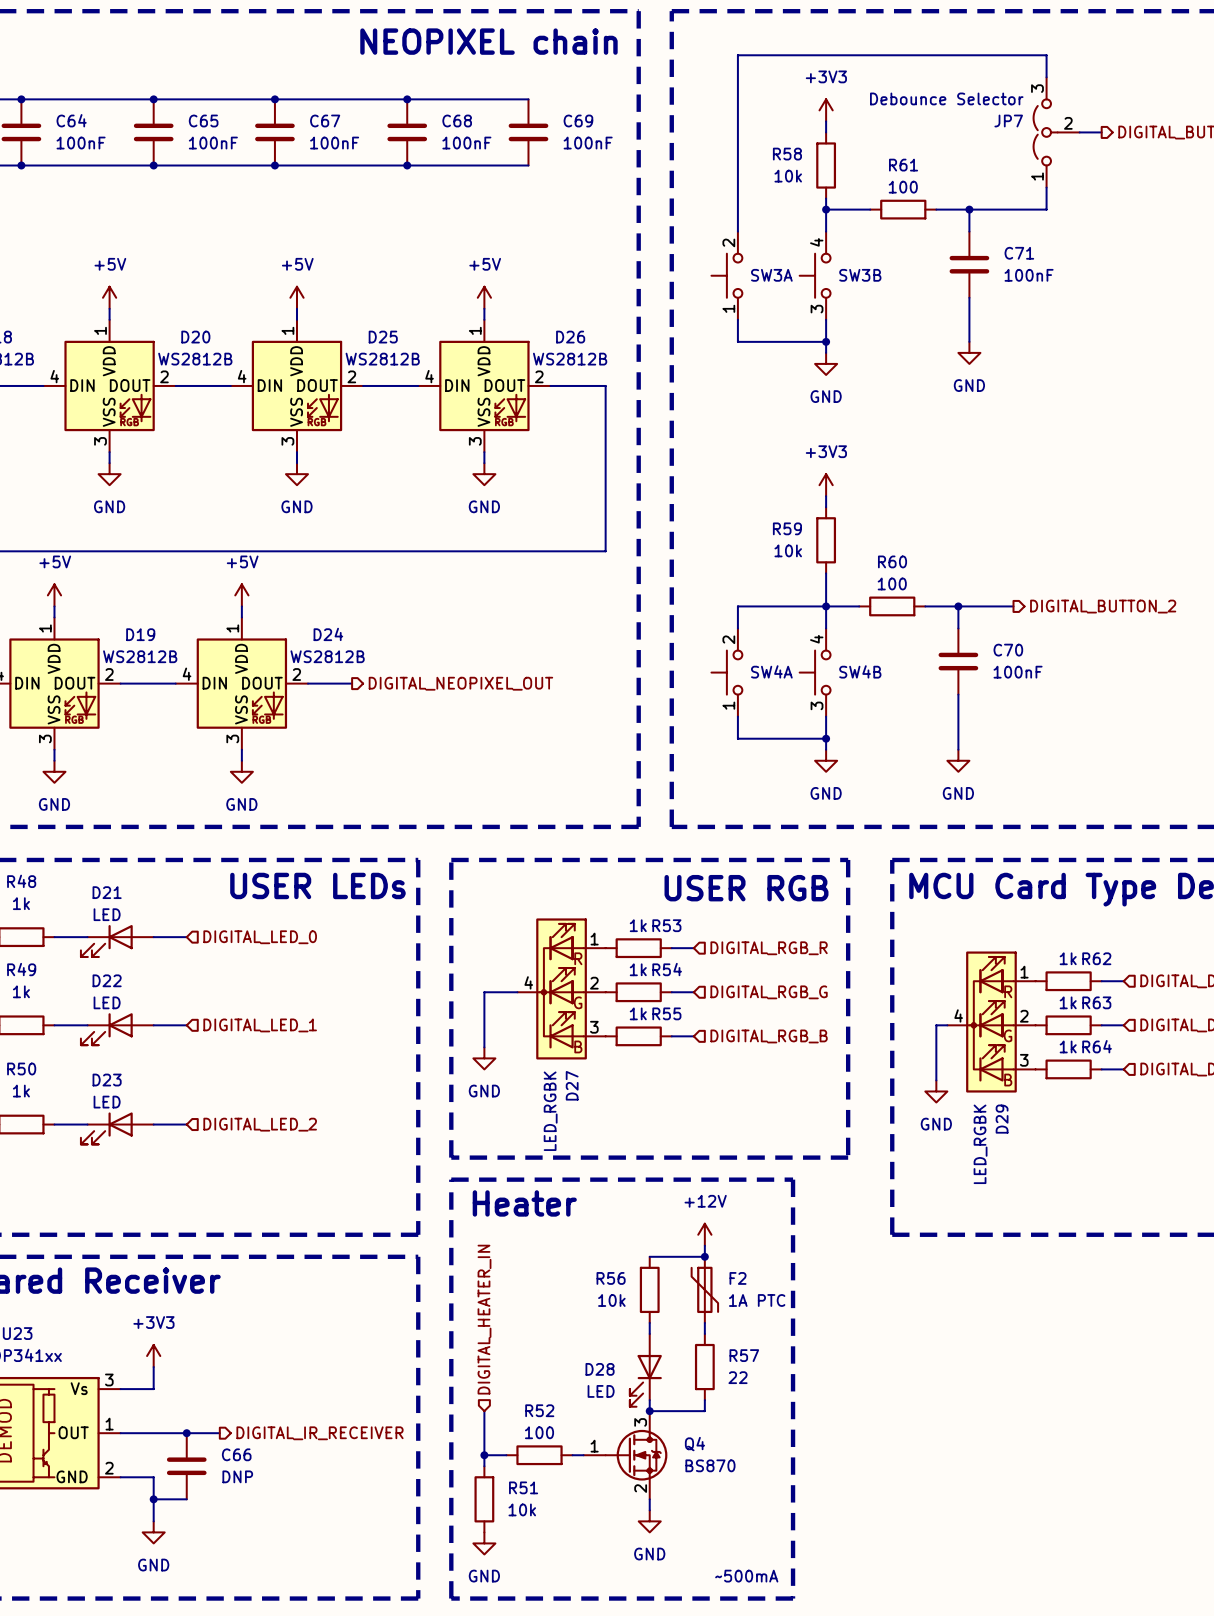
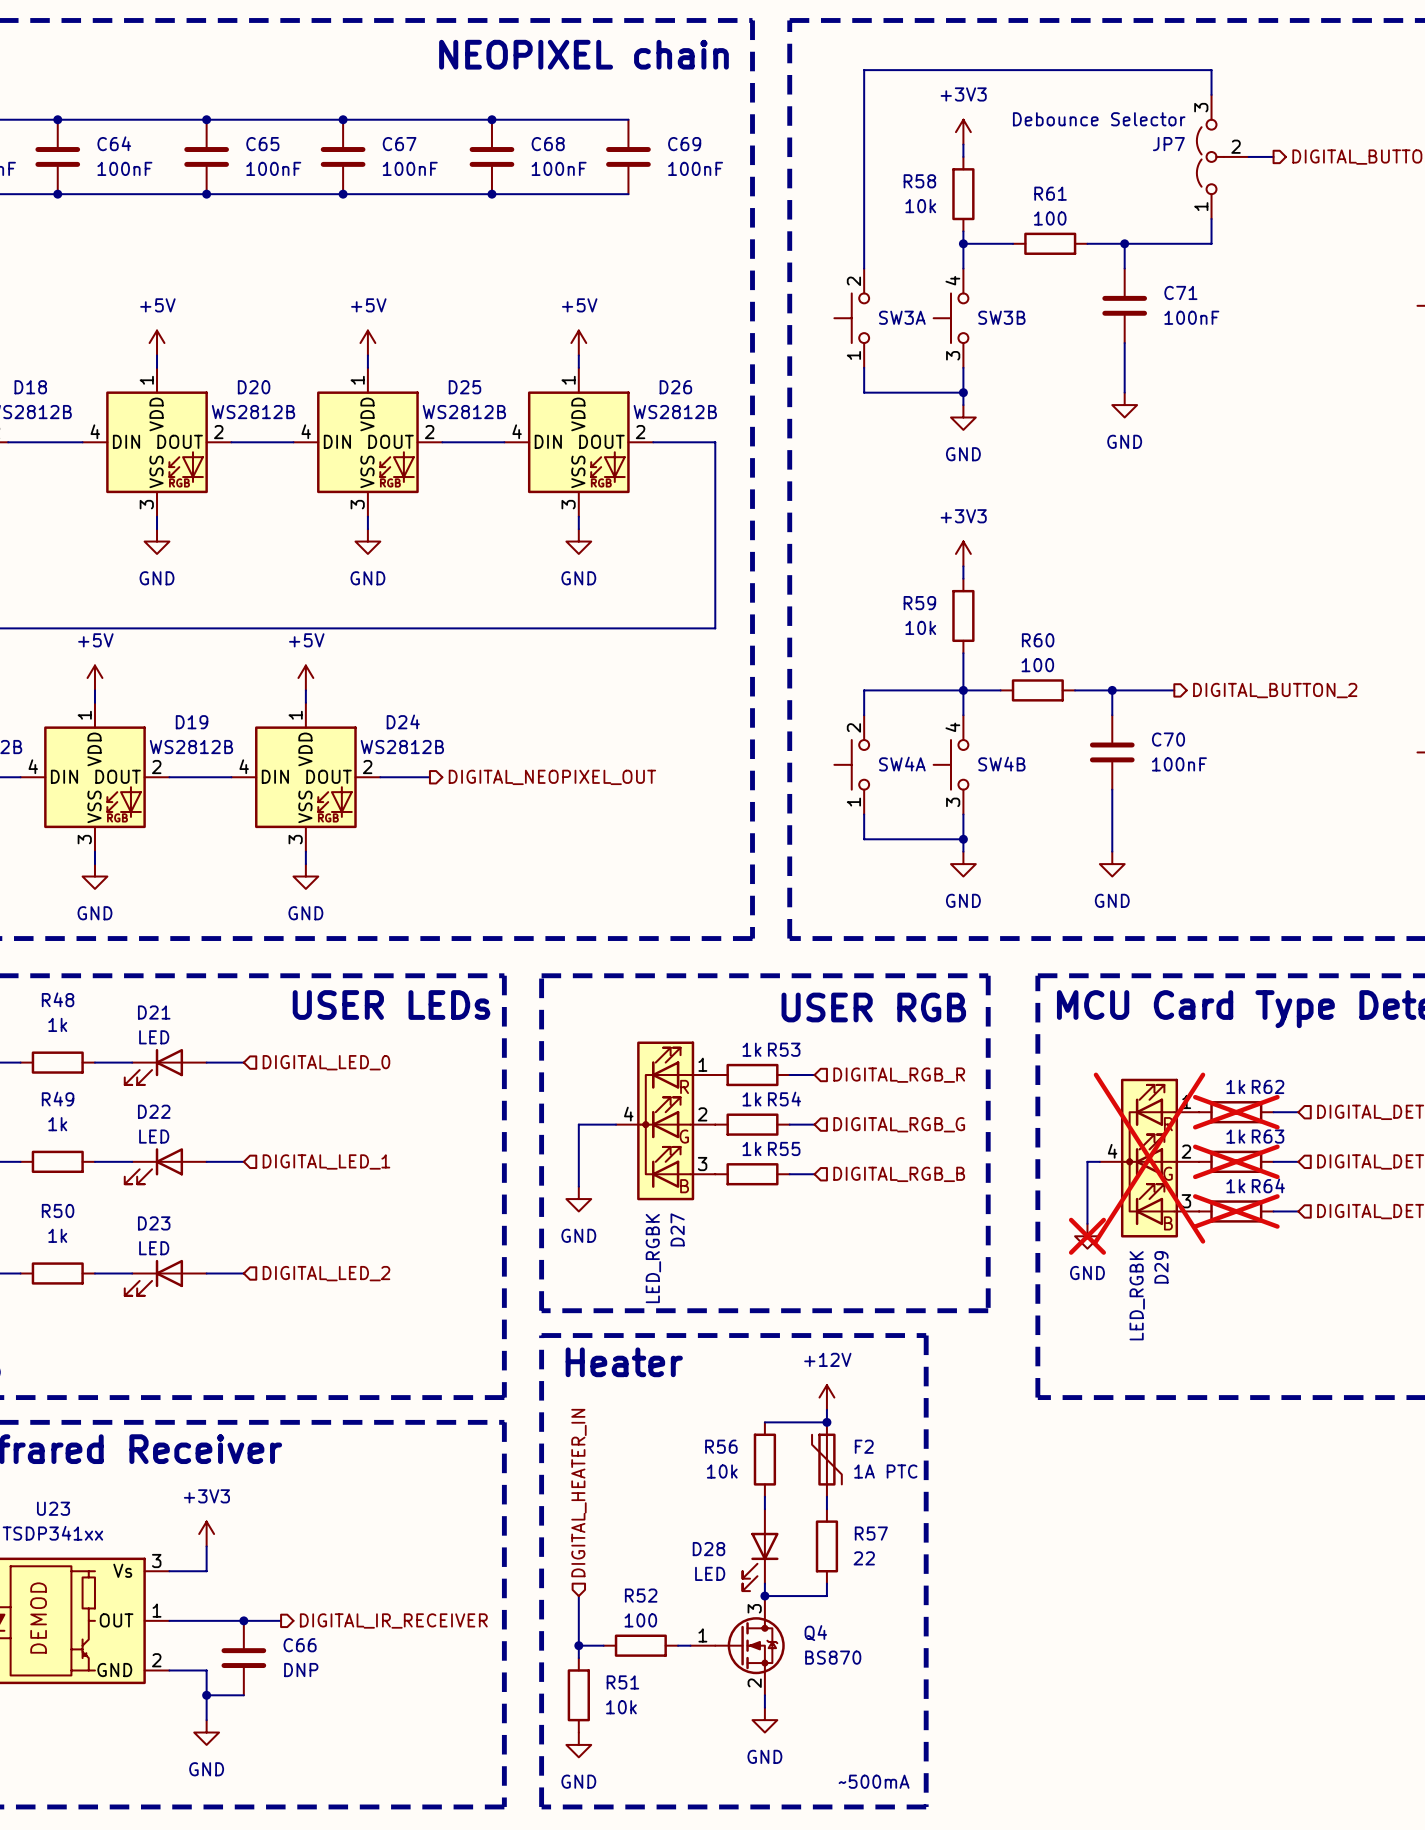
R62 do-not-place cross: none -> (1236, 1112)
D29 do-not-place cross: none -> (1149, 1158)
R63 do-not-place cross: none -> (1236, 1161)
R64 do-not-place cross: none -> (1236, 1211)
power symbol do-not-place cross: none -> (1087, 1236)

